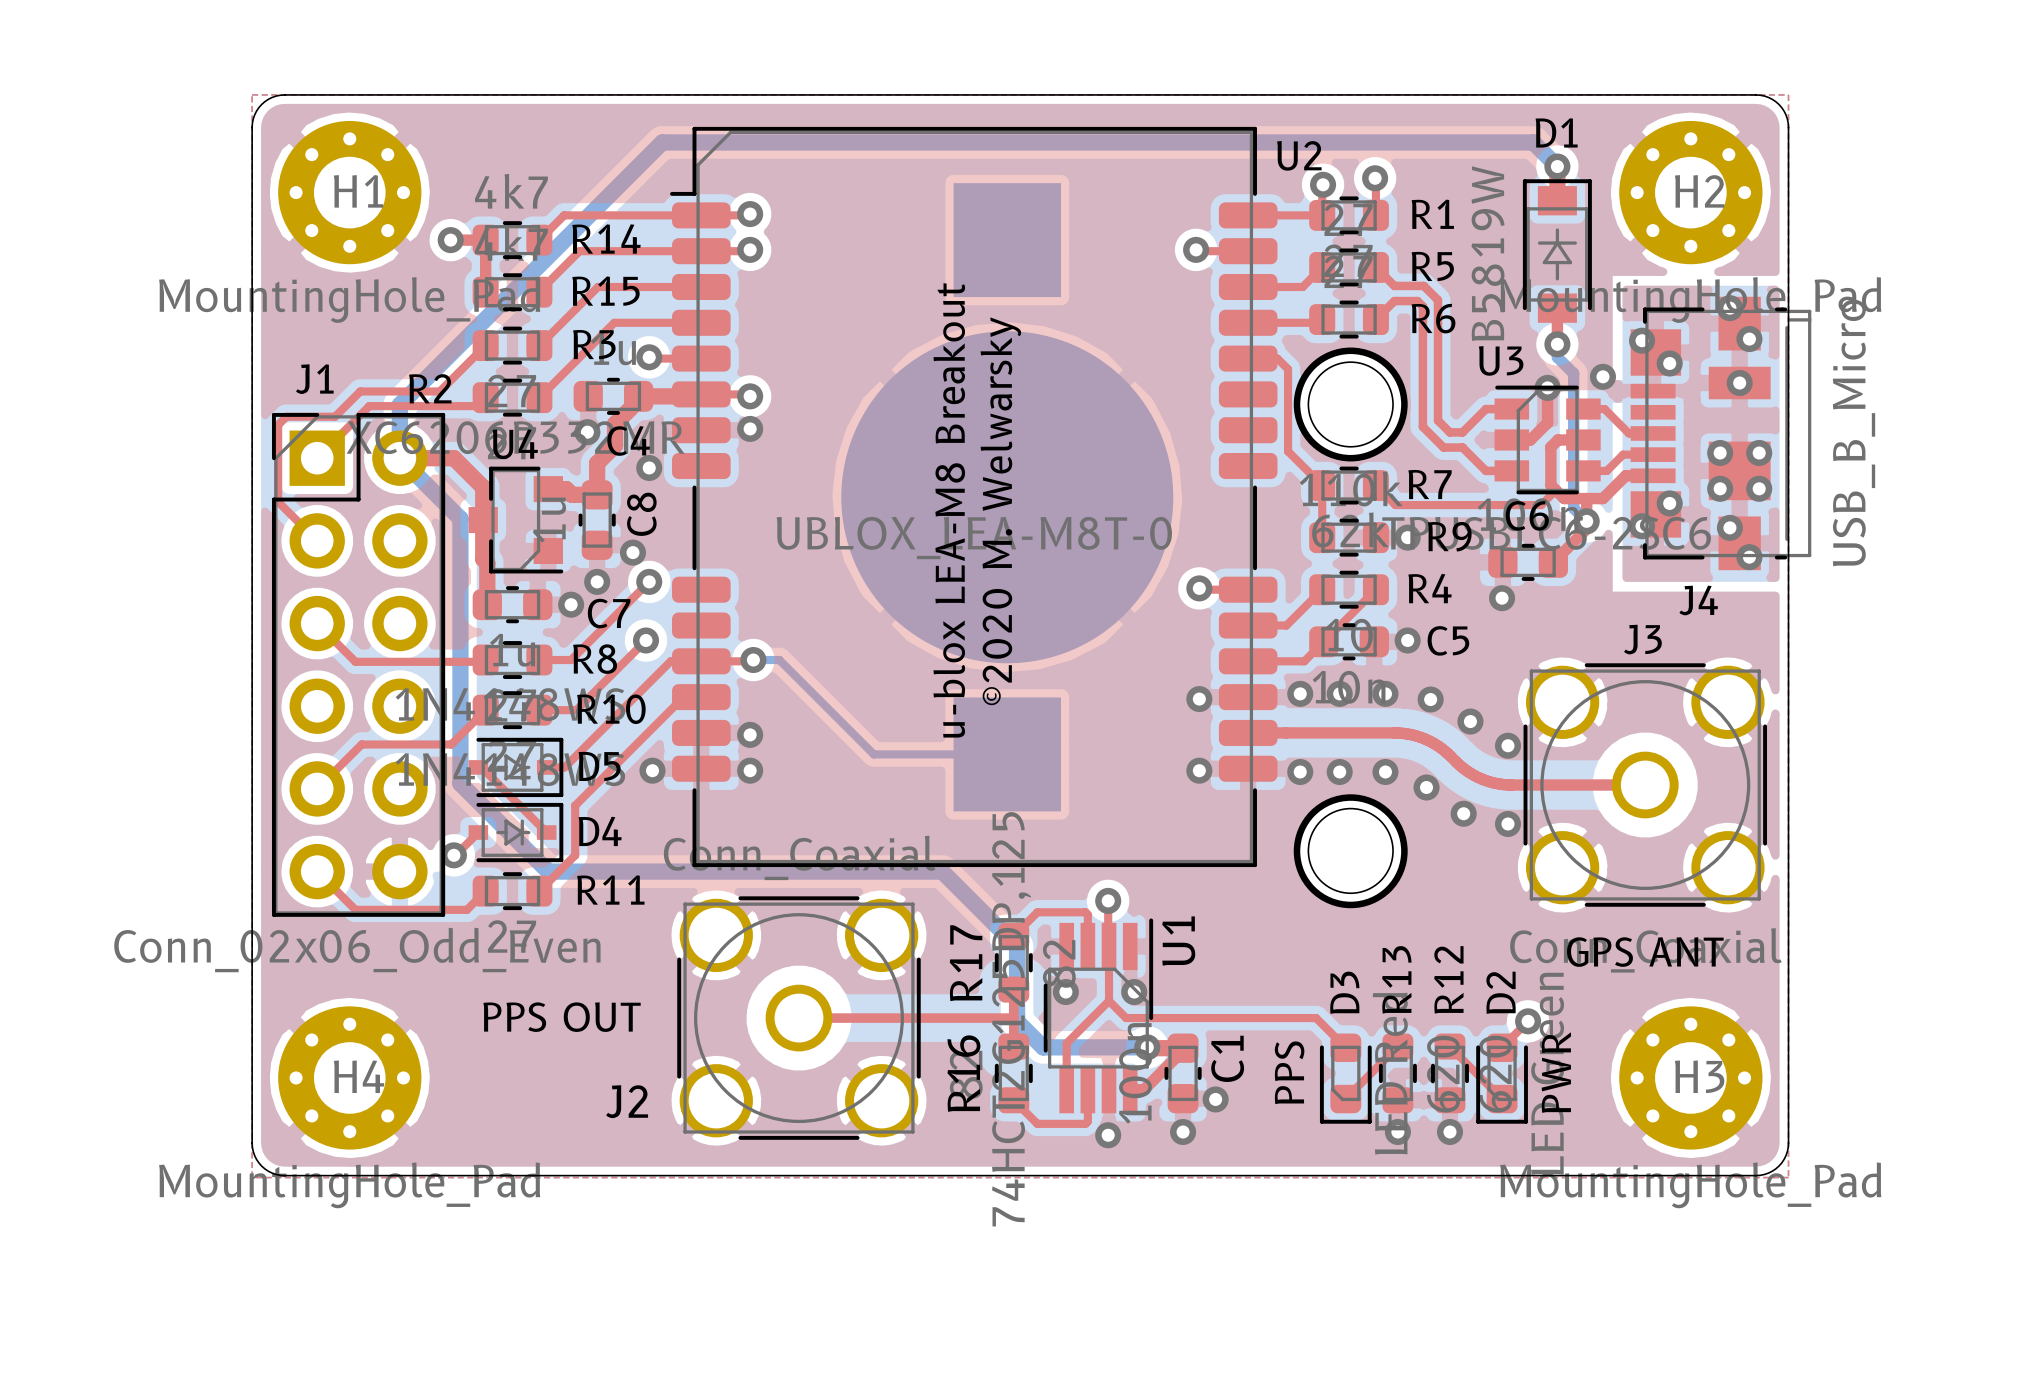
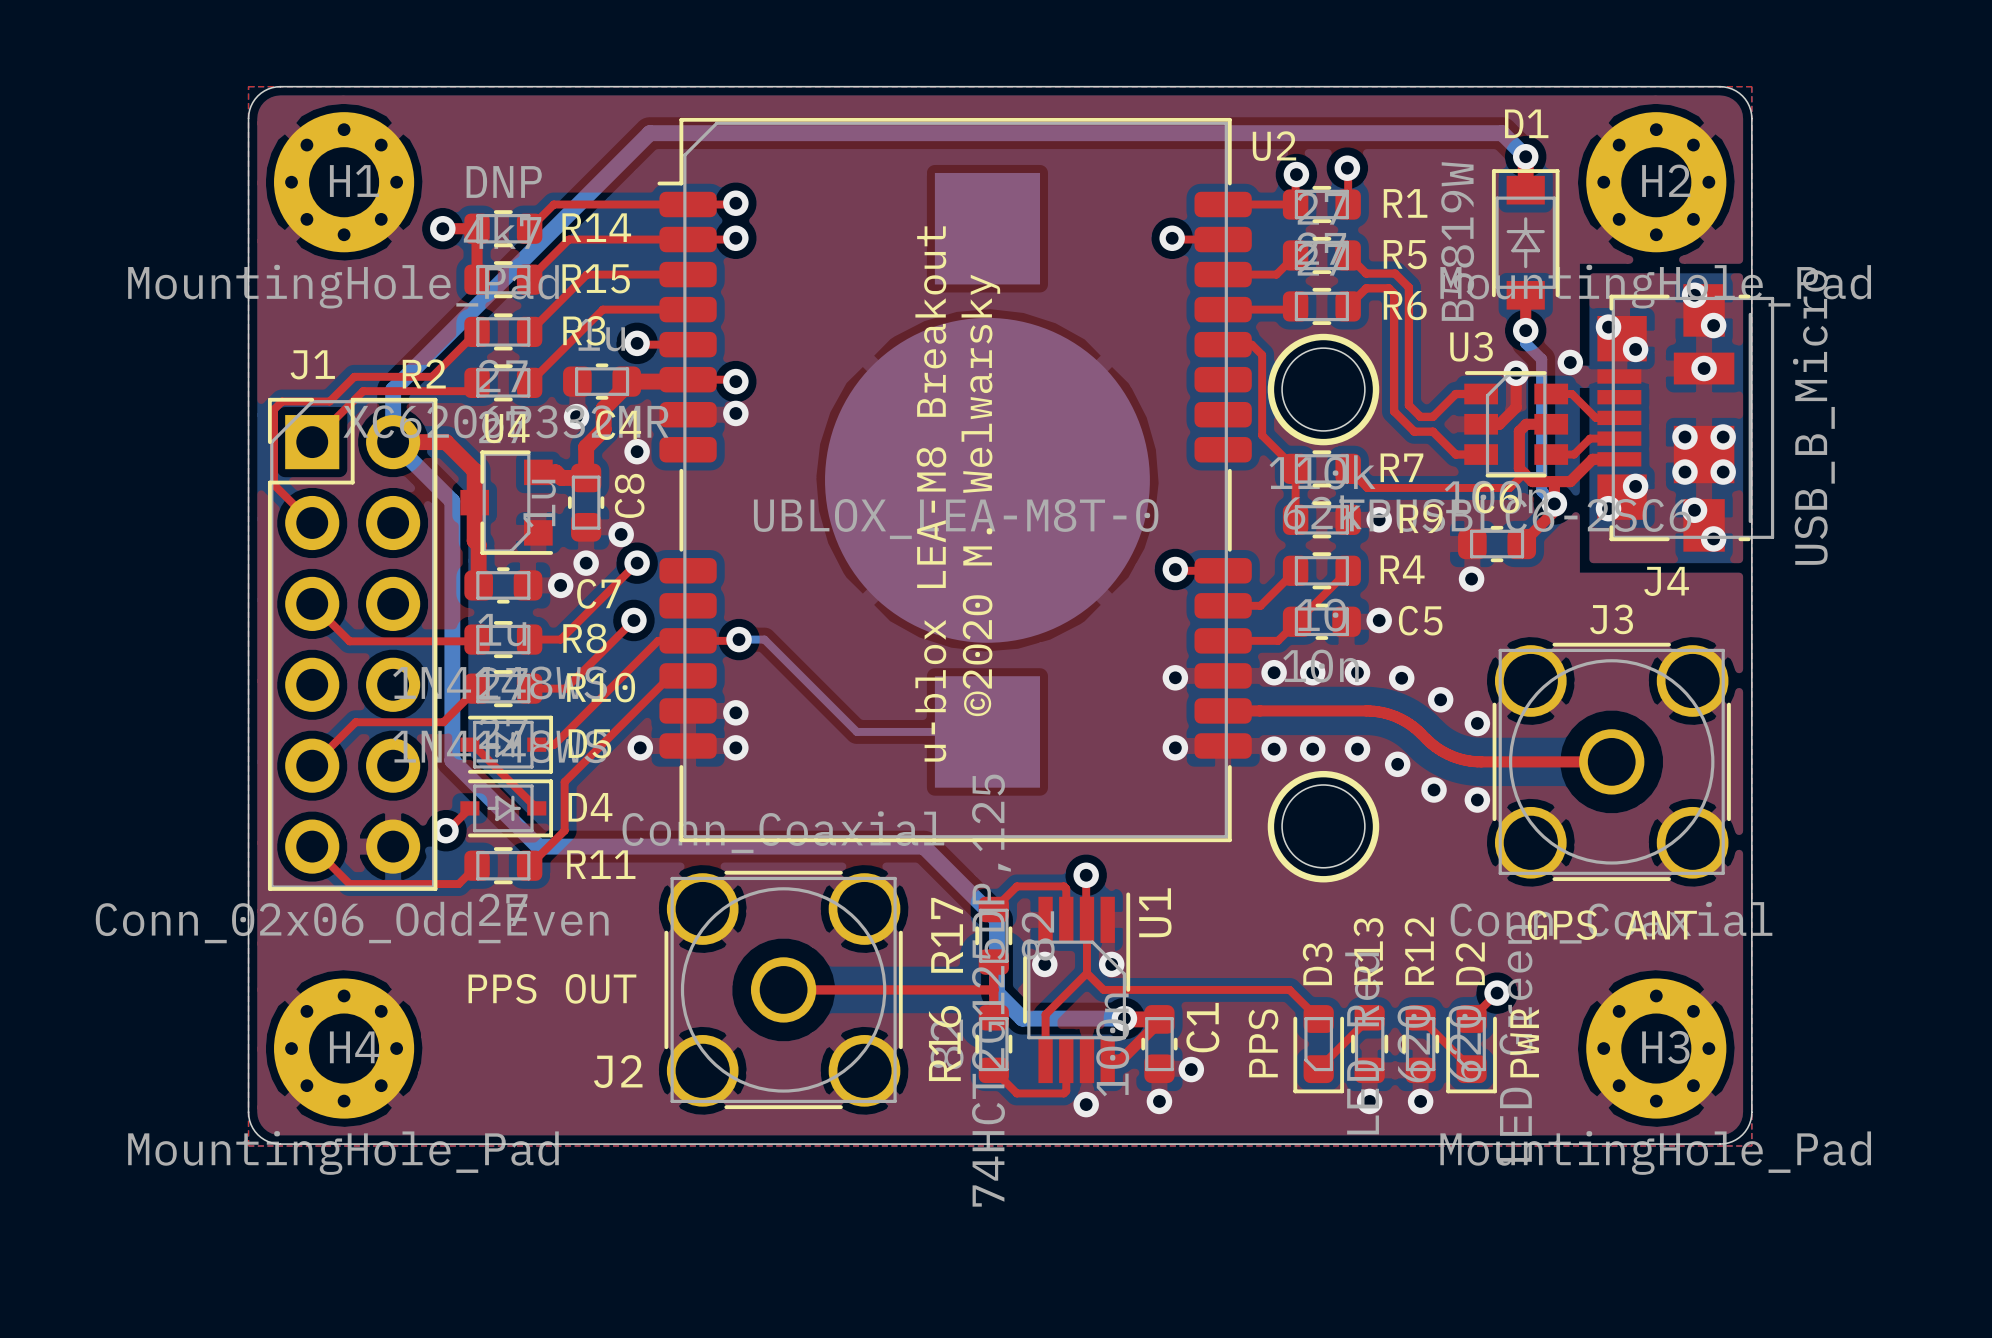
R14 value: 4k7 (511, 191) -> DNP (504, 181)

